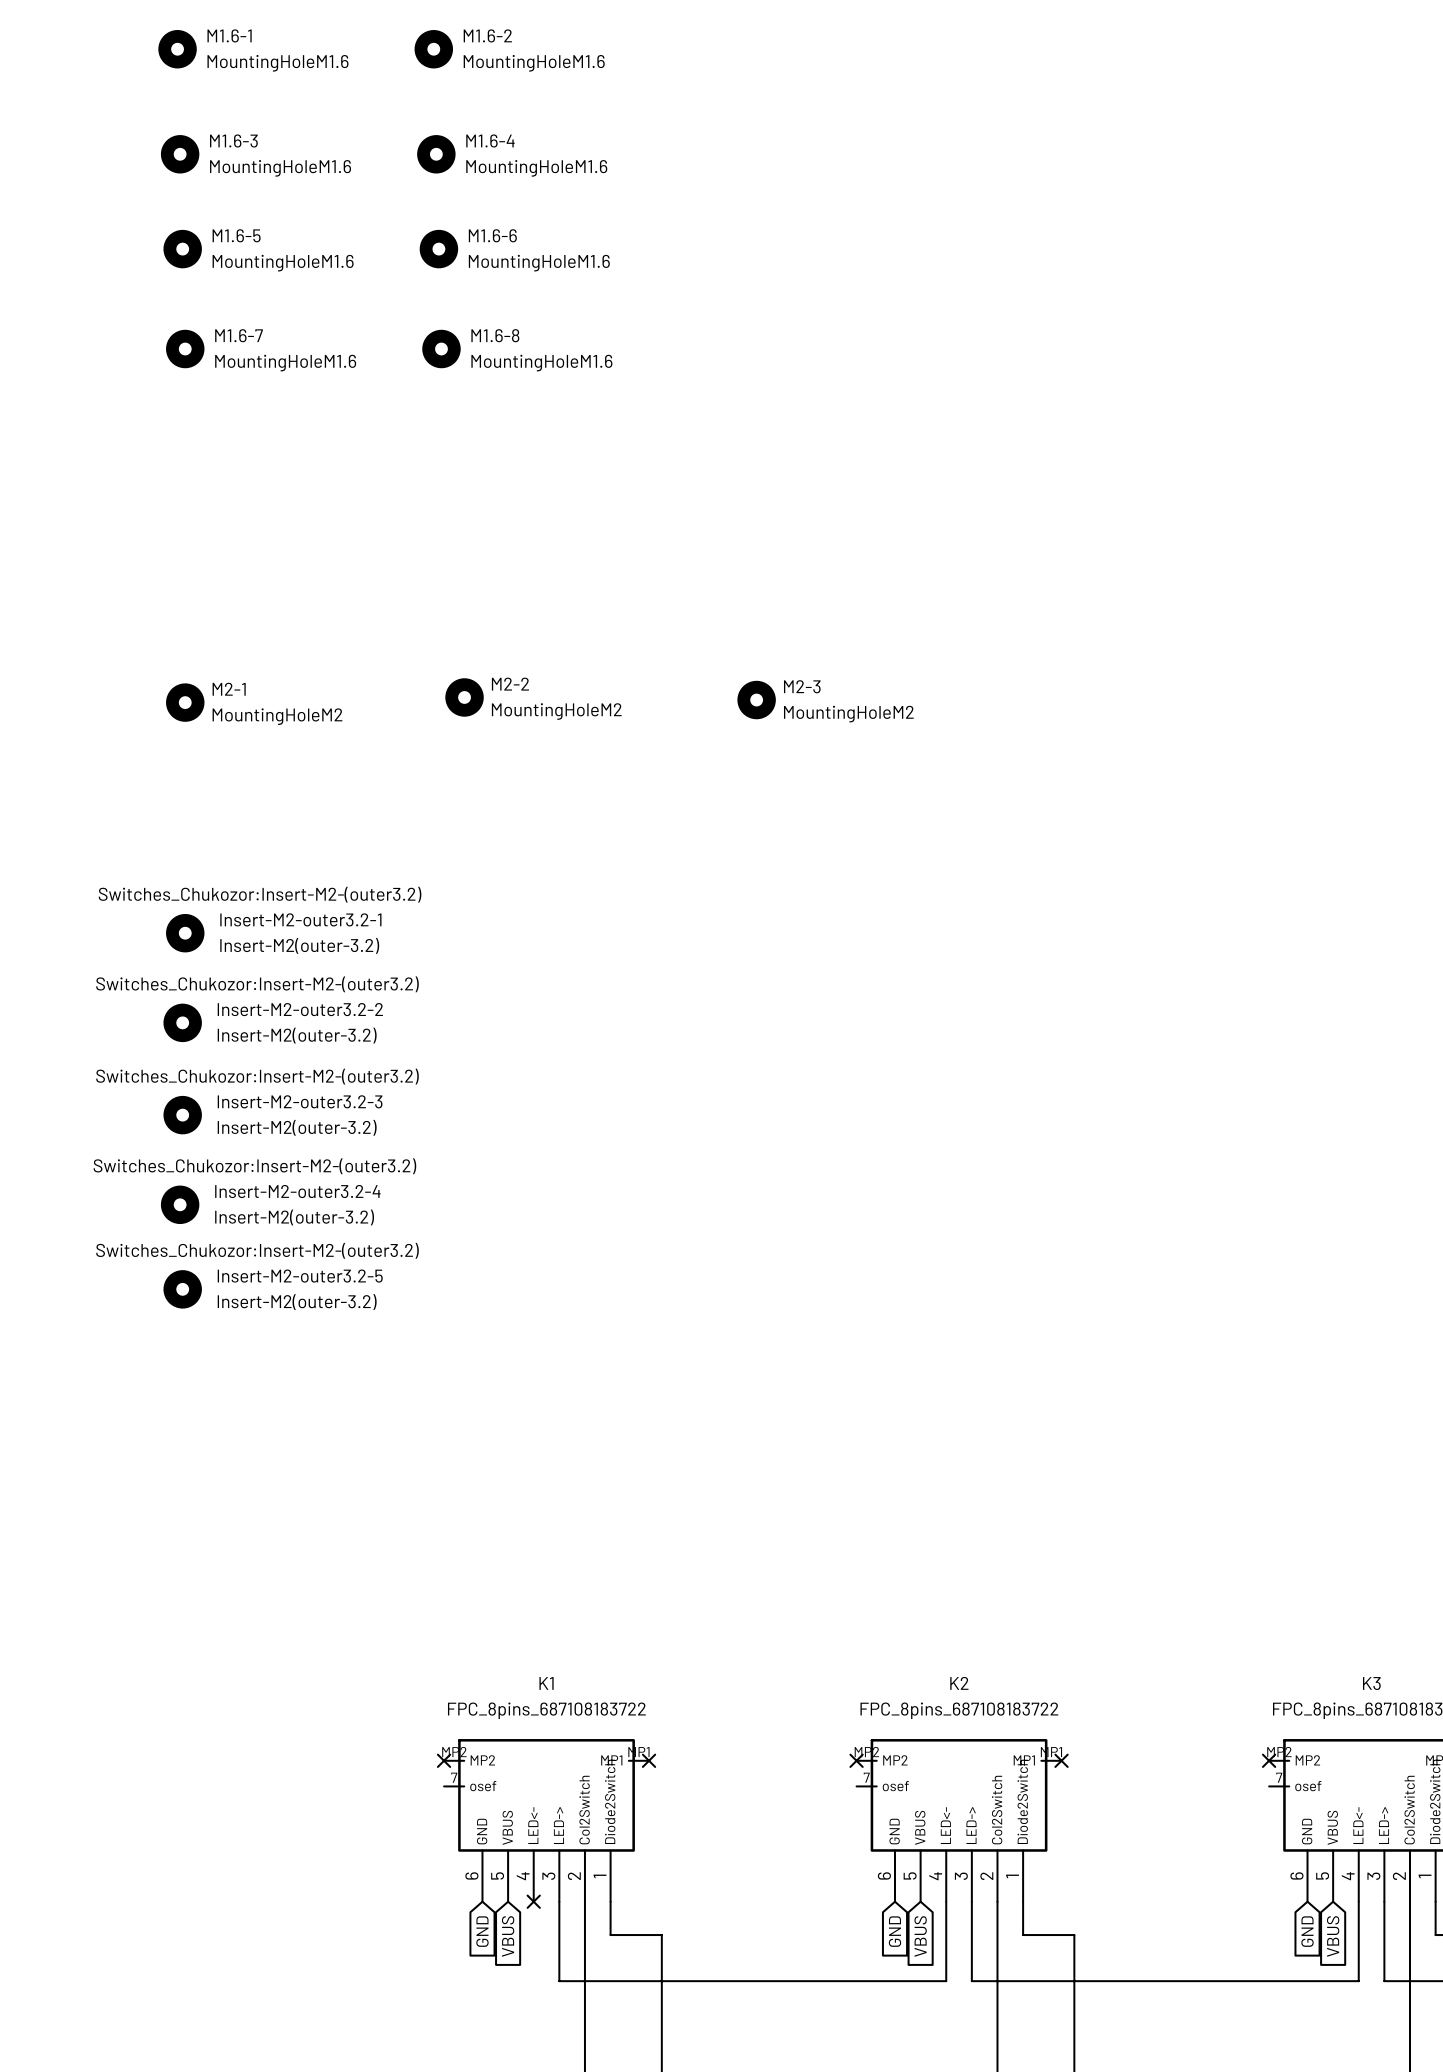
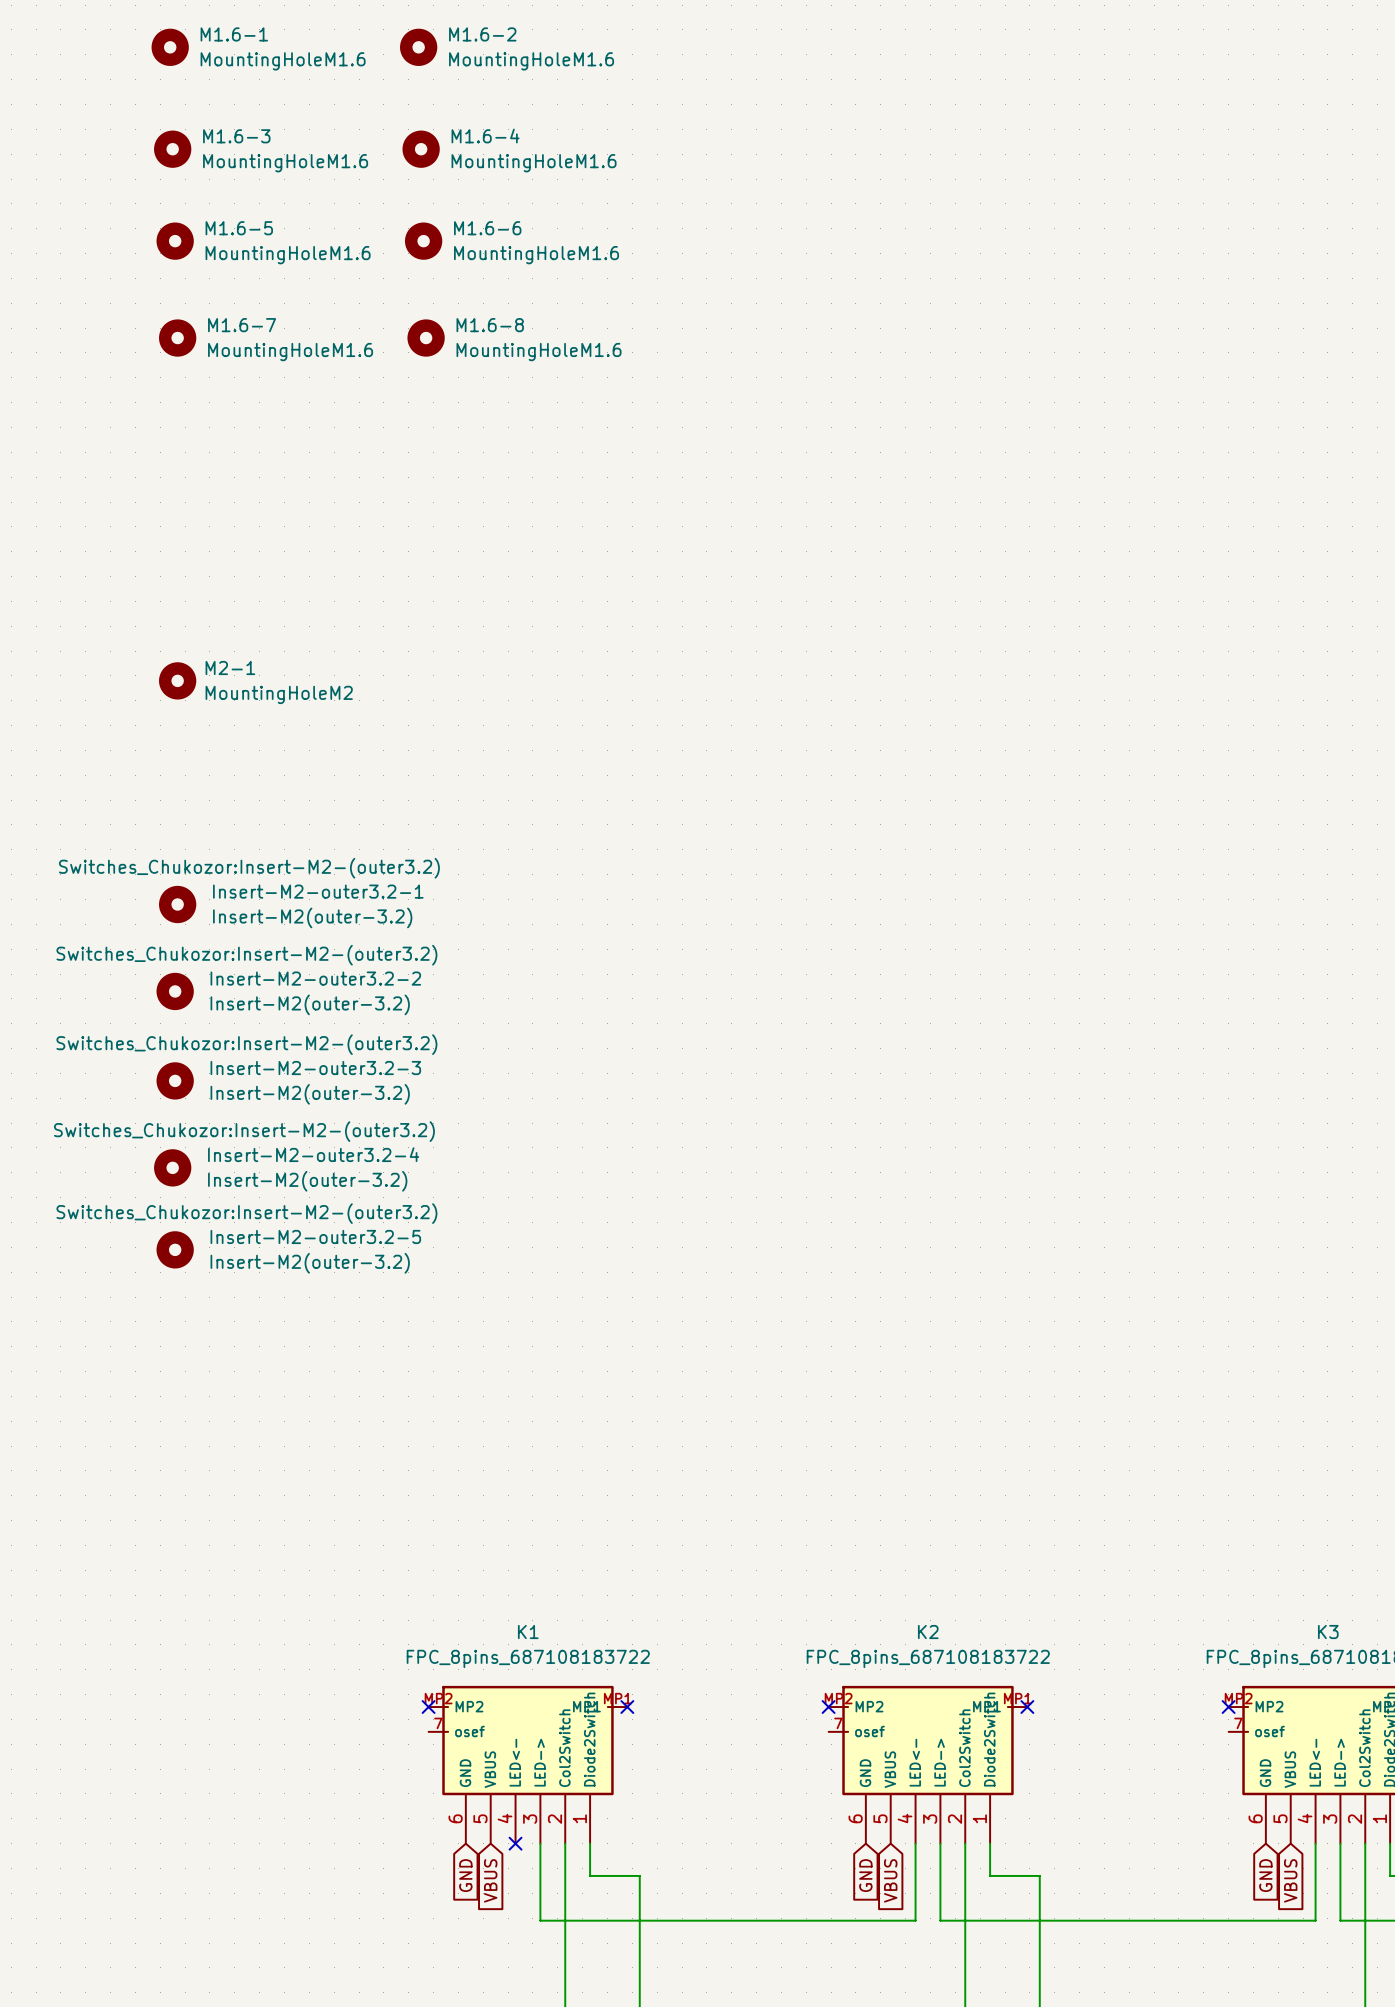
M2-2: MountingHoleM2 (464, 697) -> none
M2-3: MountingHoleM2 (756, 700) -> none

